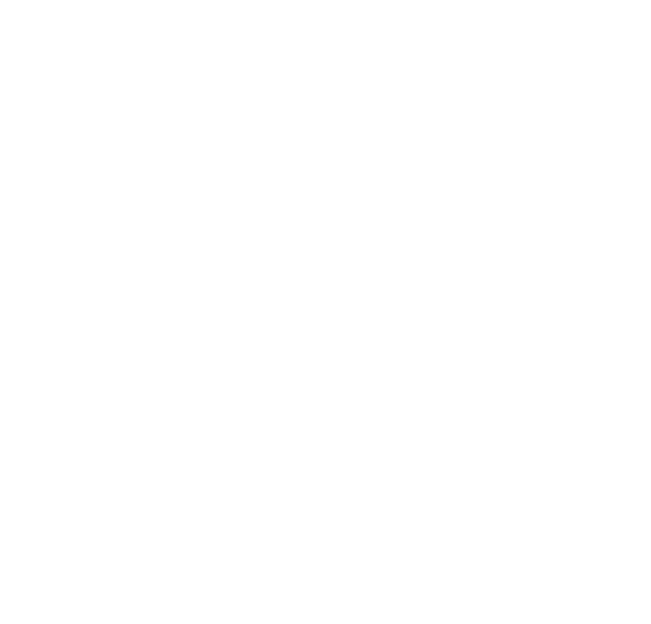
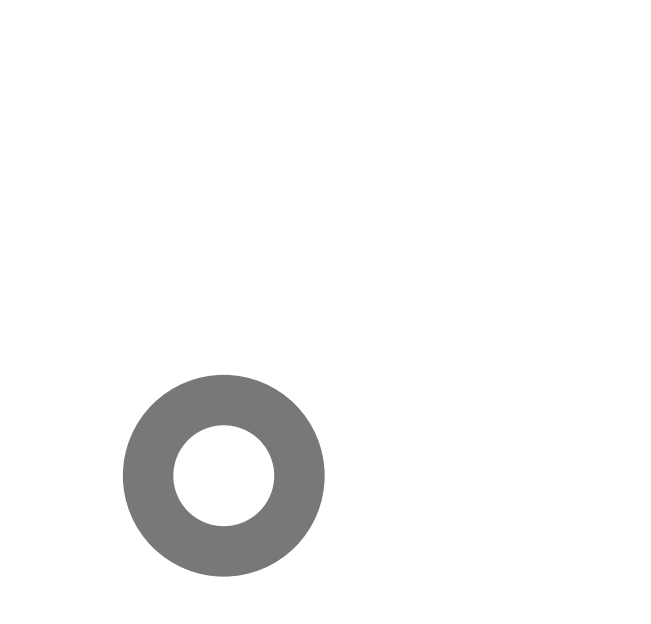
via: none -> (223, 475)

